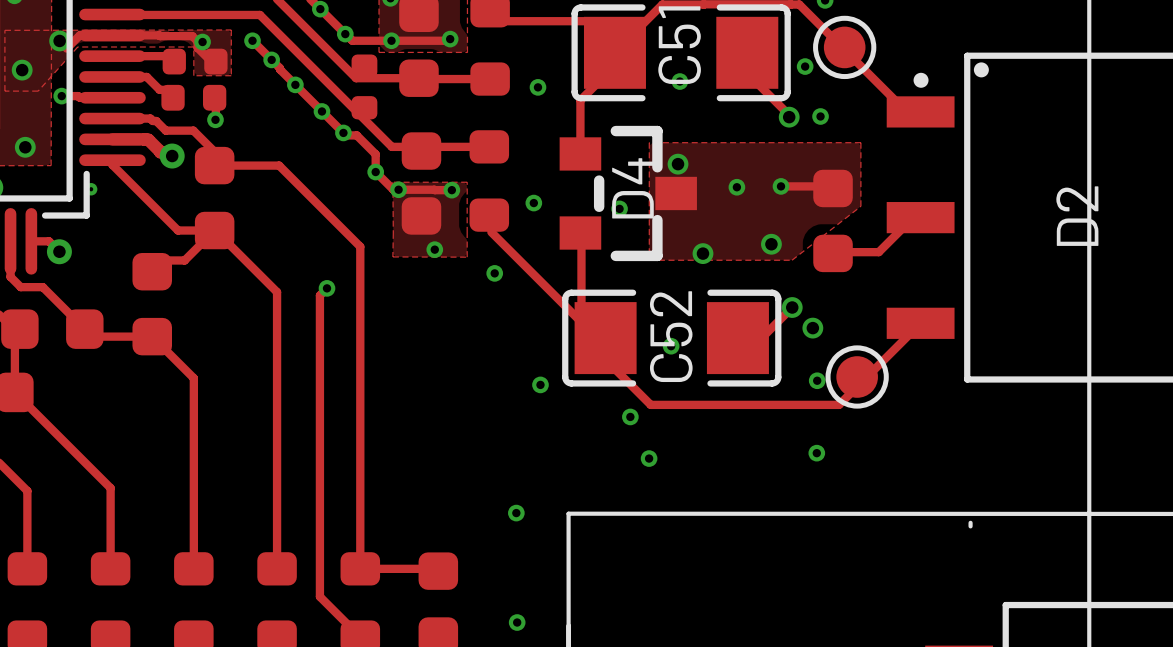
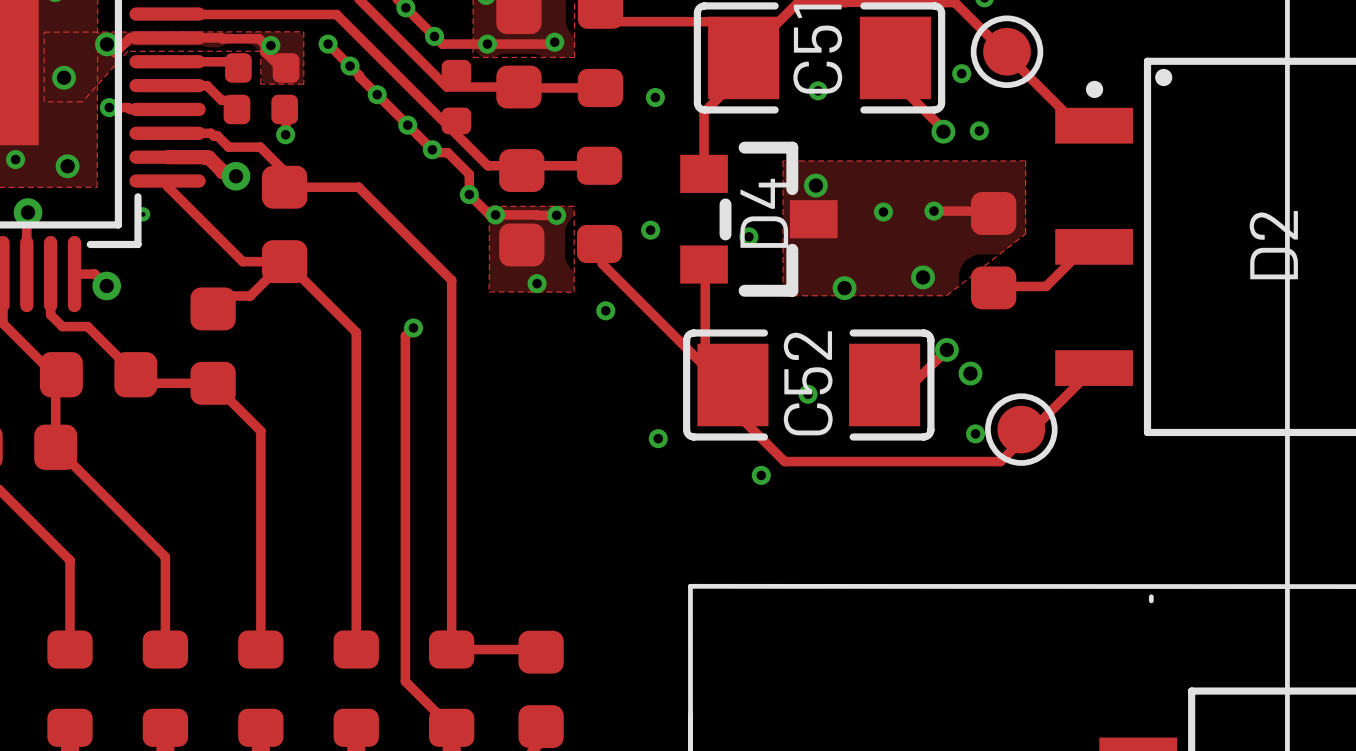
via: (816, 453) -> none
via: (649, 458) -> none
via: (516, 513) -> none
via: (517, 622) -> none

